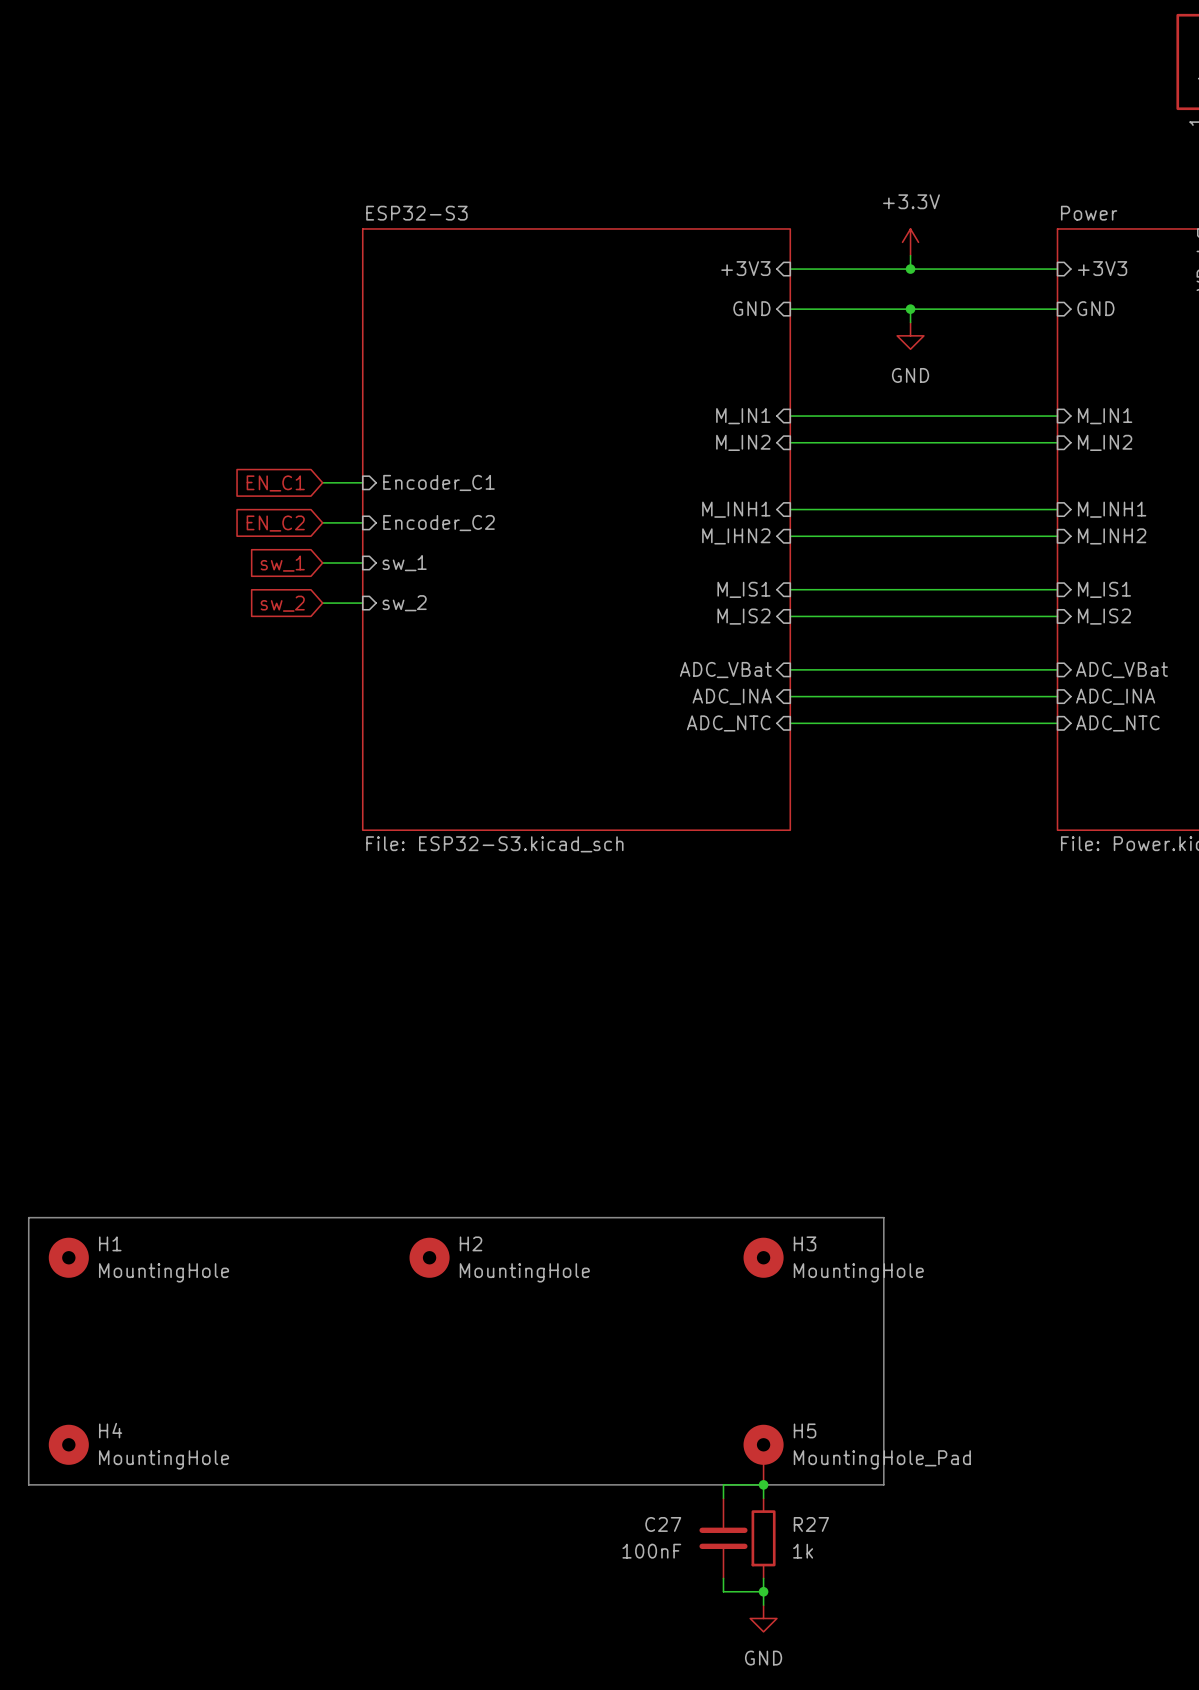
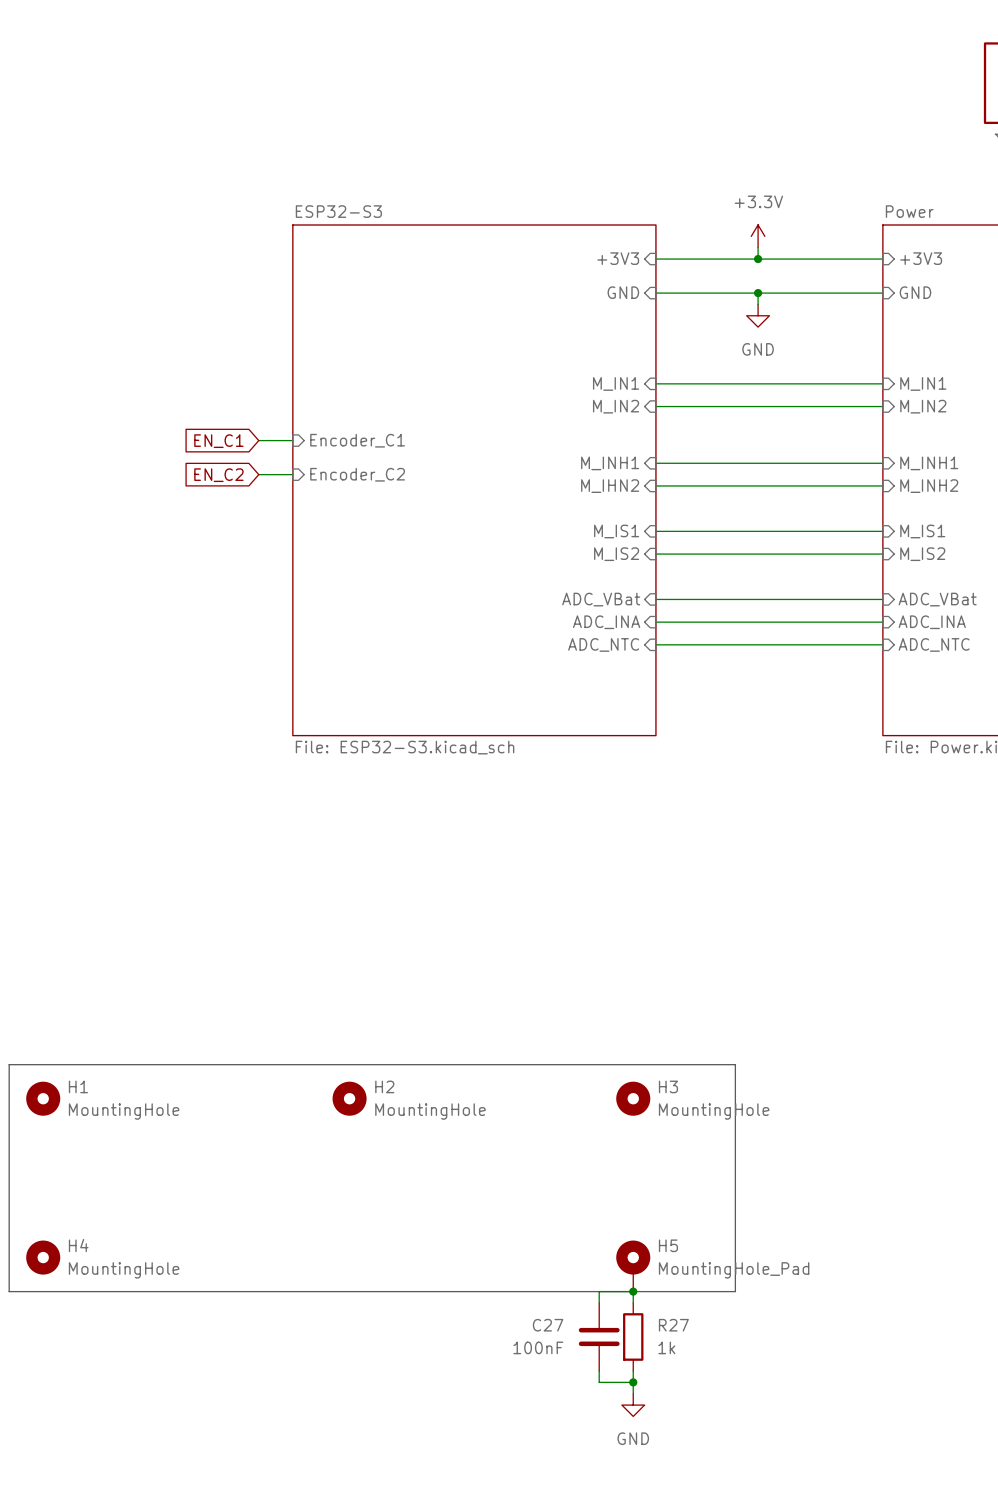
global label: sw_1 (282, 563) -> none
wire: (322, 563) (362, 563) -> none
sheet pin: sw_1 (404, 563) -> none
global label: sw_2 (282, 603) -> none
wire: (322, 603) (362, 603) -> none
sheet pin: sw_2 (404, 603) -> none

